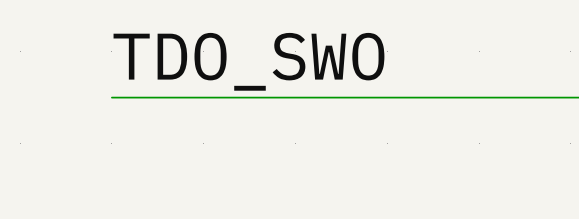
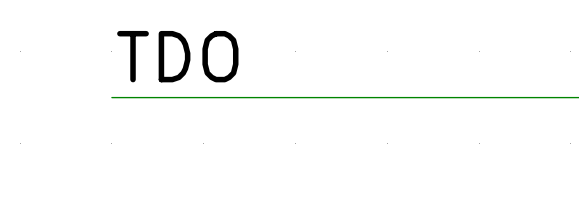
label: TDO_SWO (248, 61) -> TDO (177, 56)

